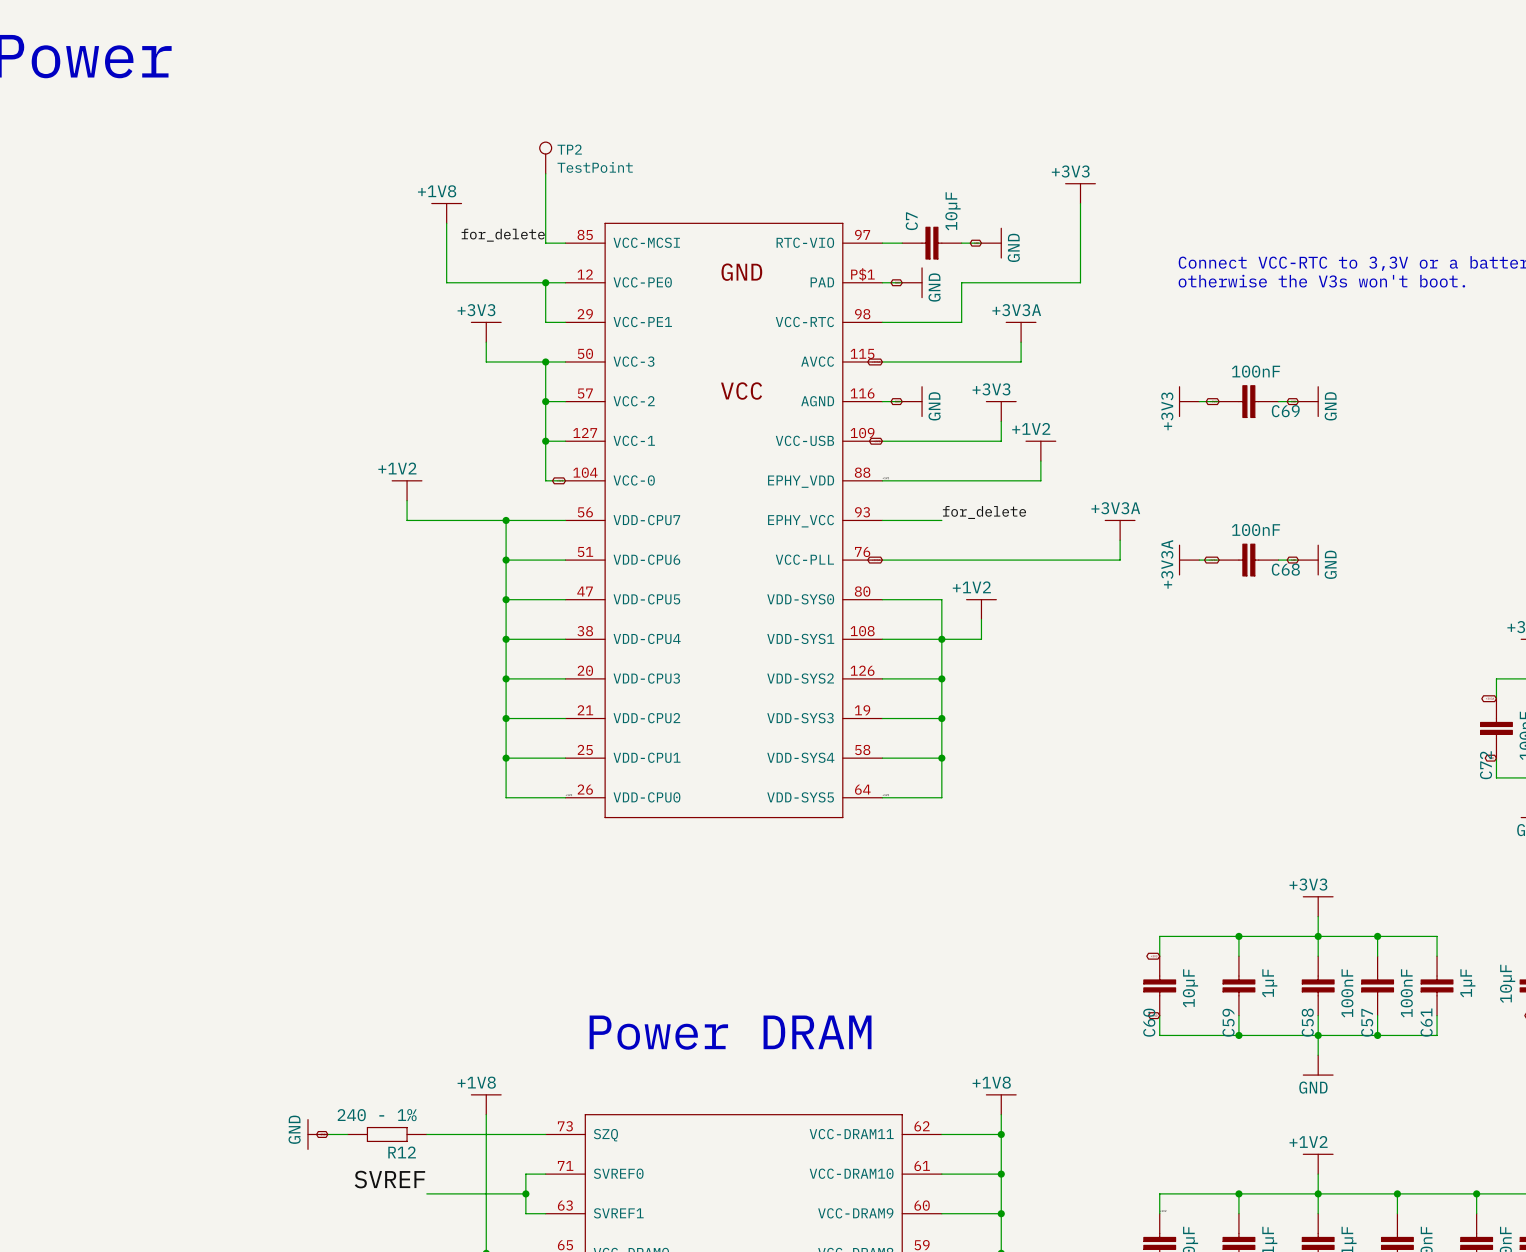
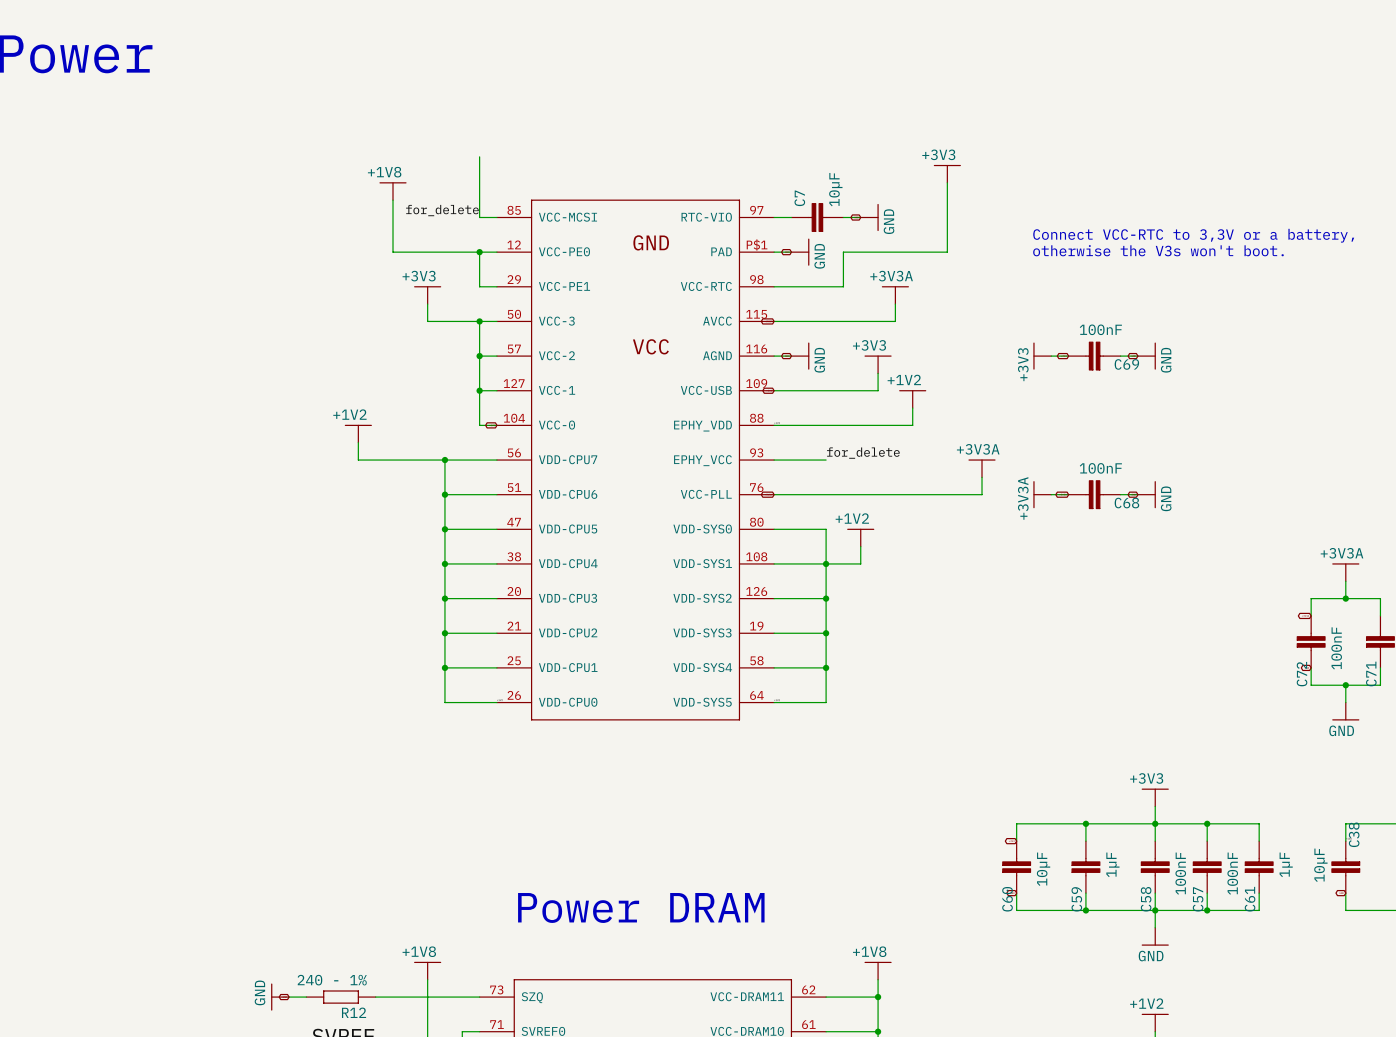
TP2: TestPoint (545, 157) -> none

